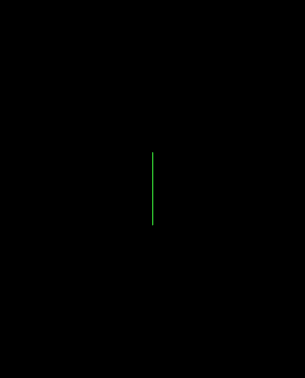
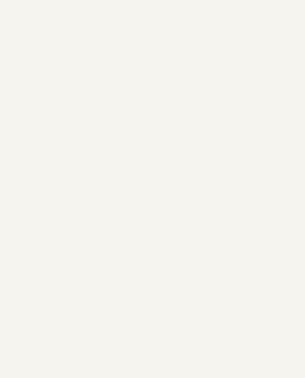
wire: (152, 152) (152, 224) -> none

